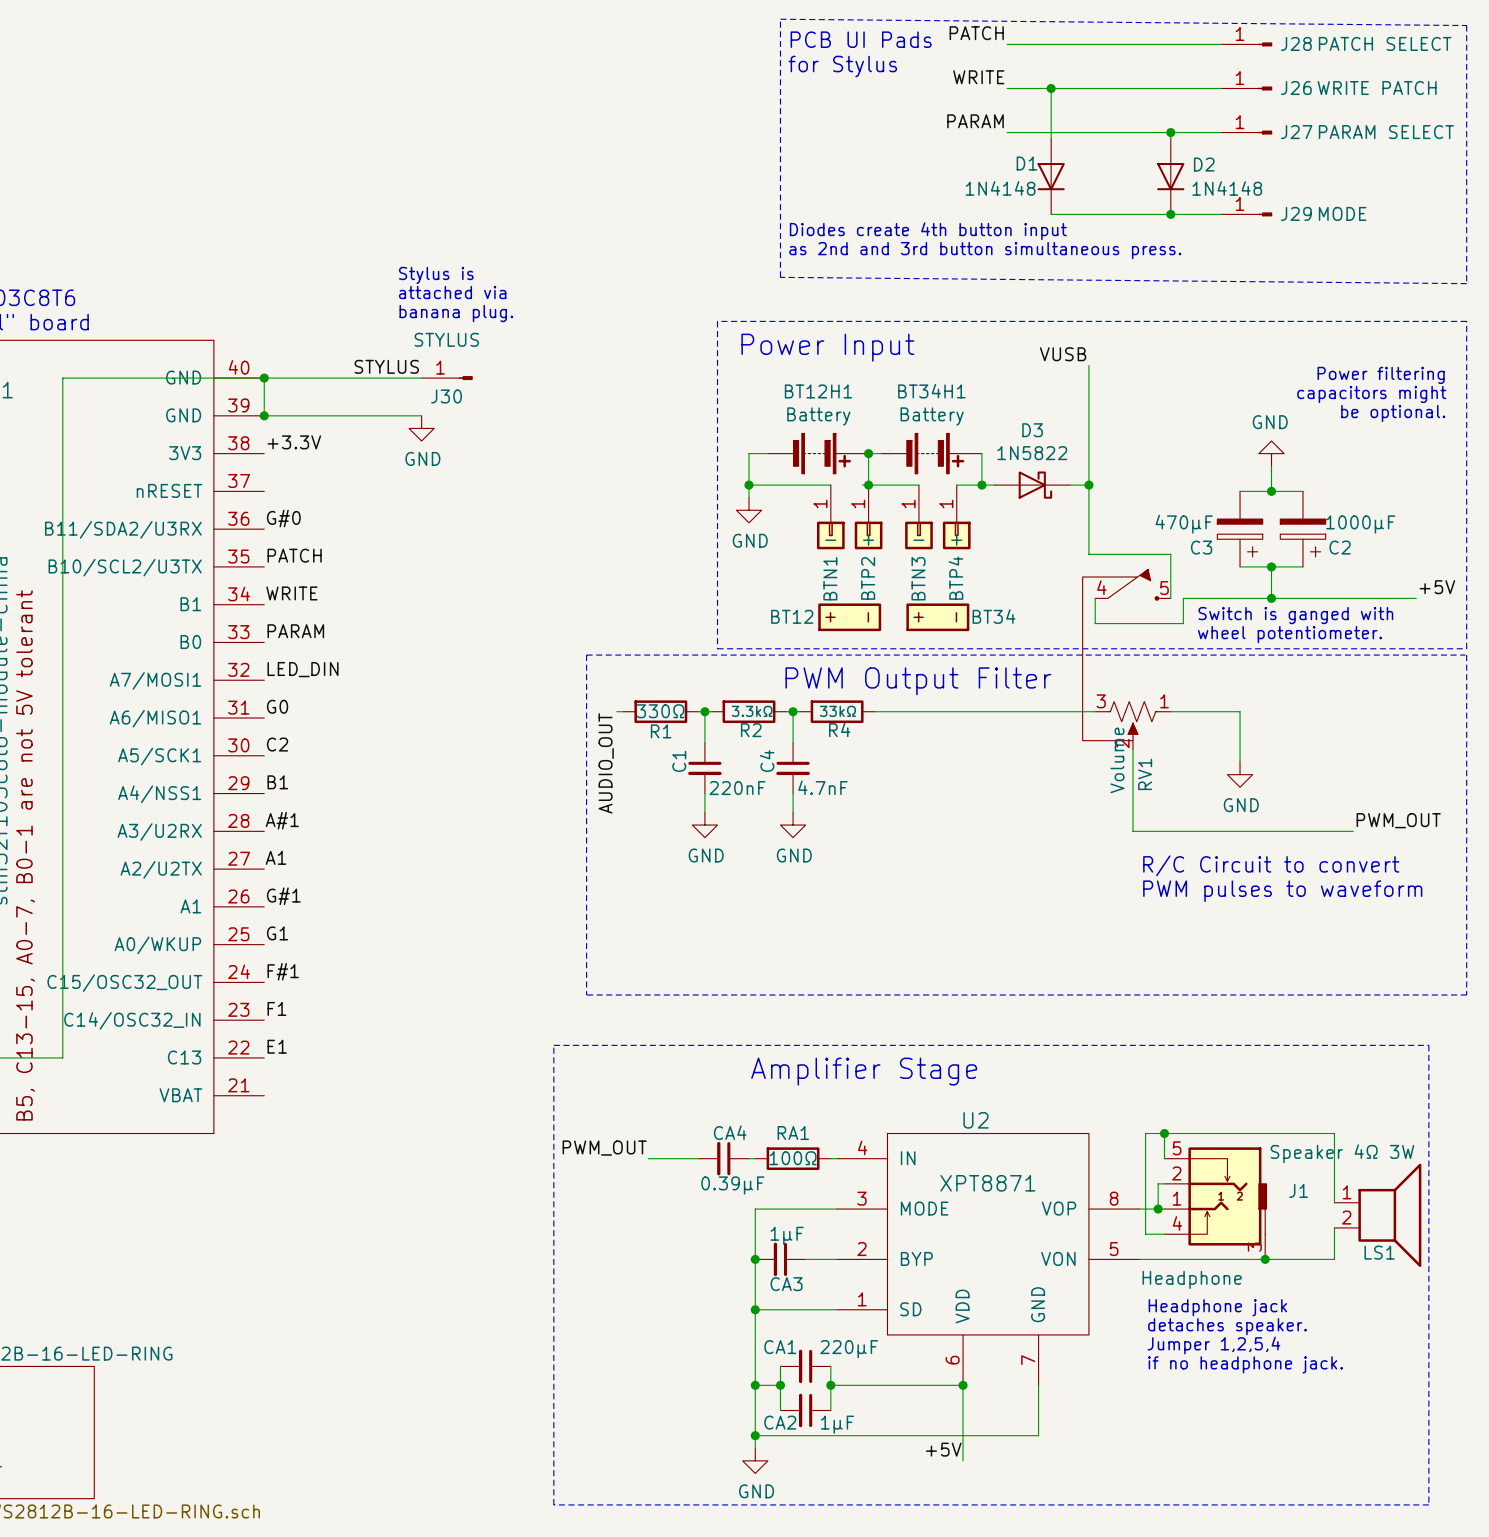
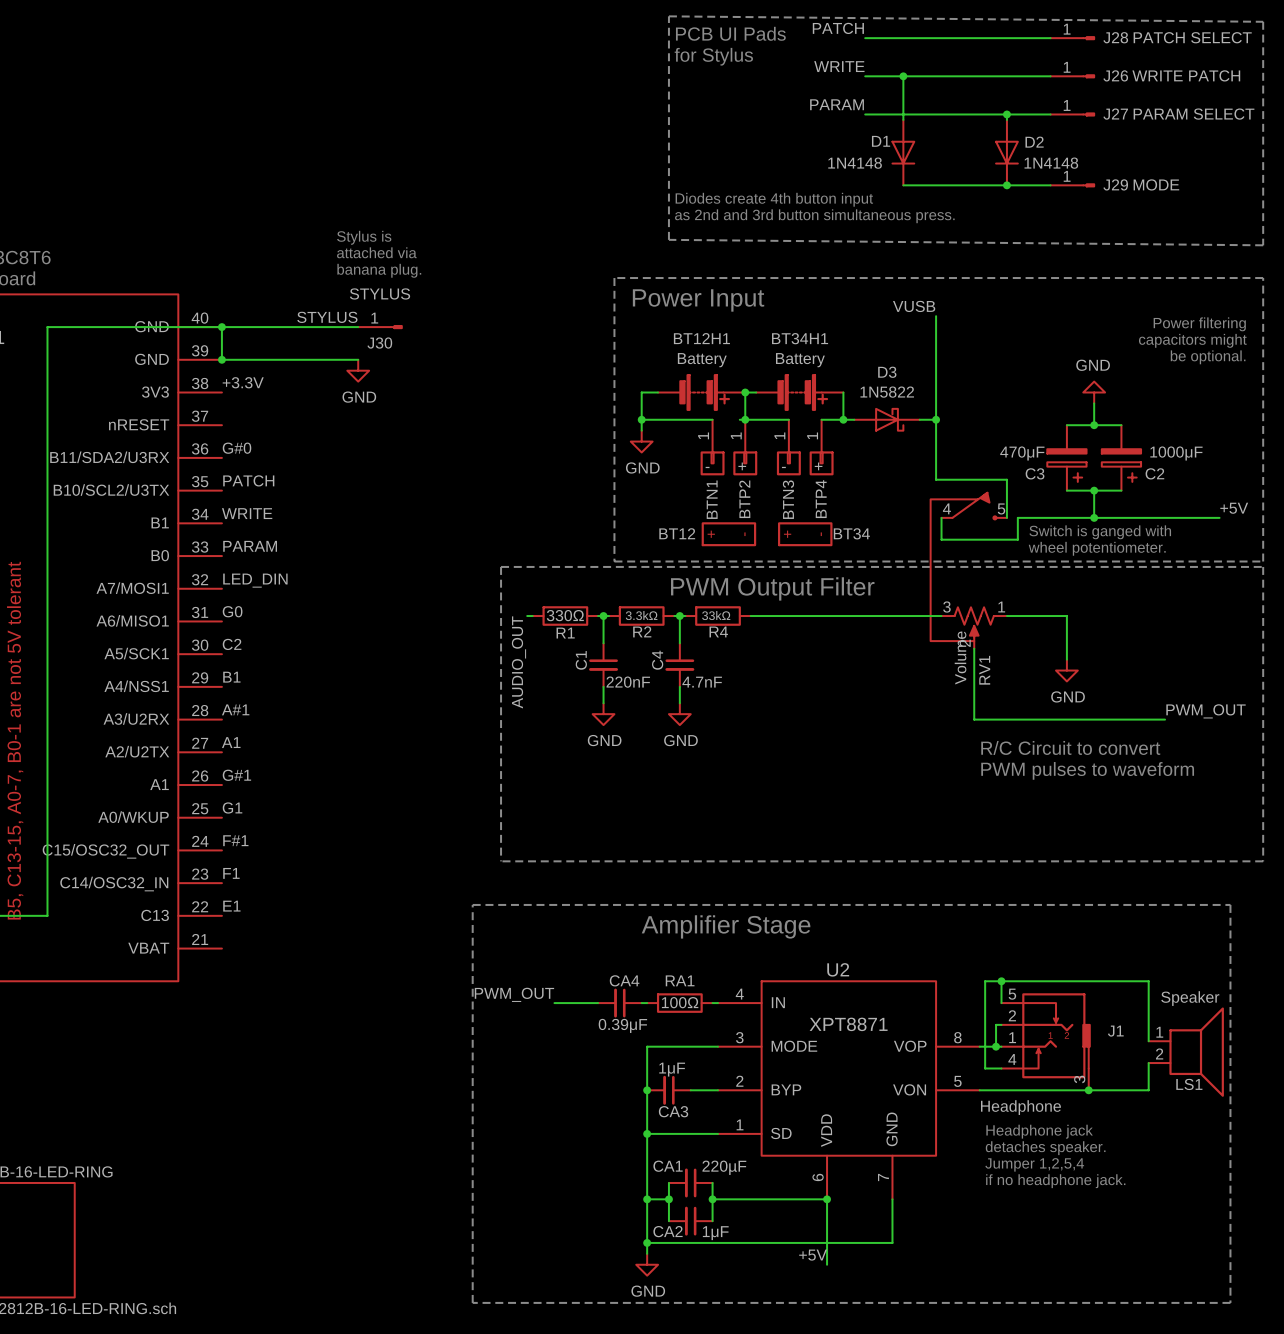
LS1 value: Speaker 4Ω 3W (1342, 1153) -> Speaker (1190, 998)

